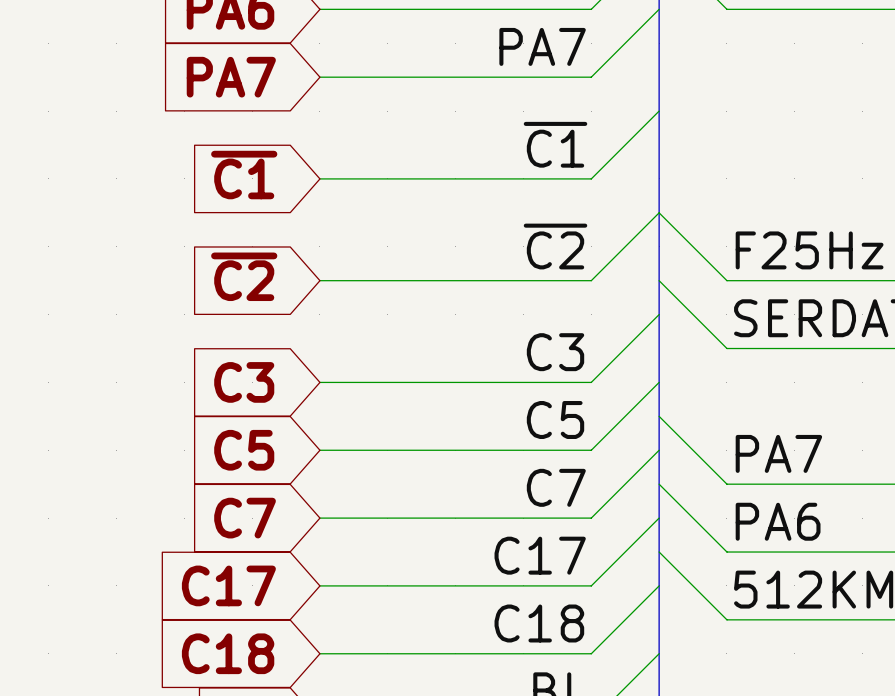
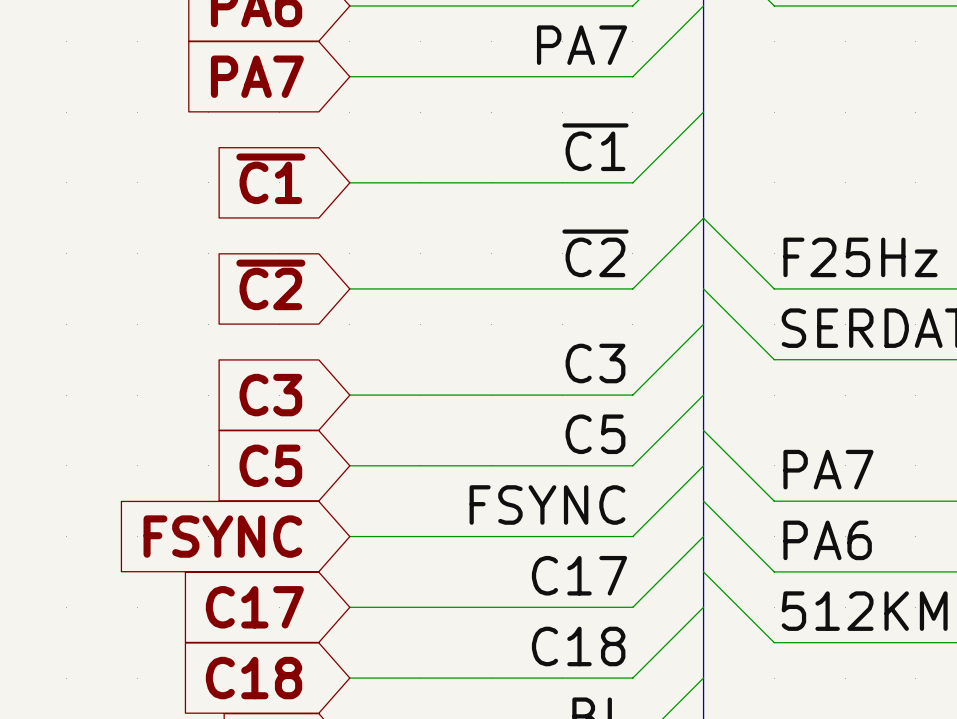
label: C7 (556, 487) -> FSYNC (547, 504)
global label: C7 (245, 518) -> FSYNC (222, 536)

